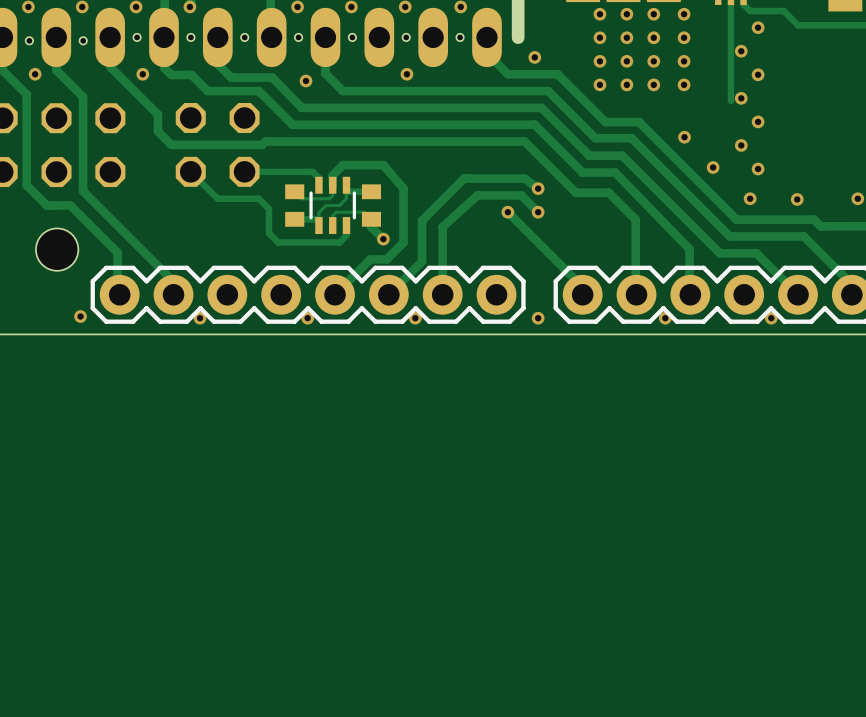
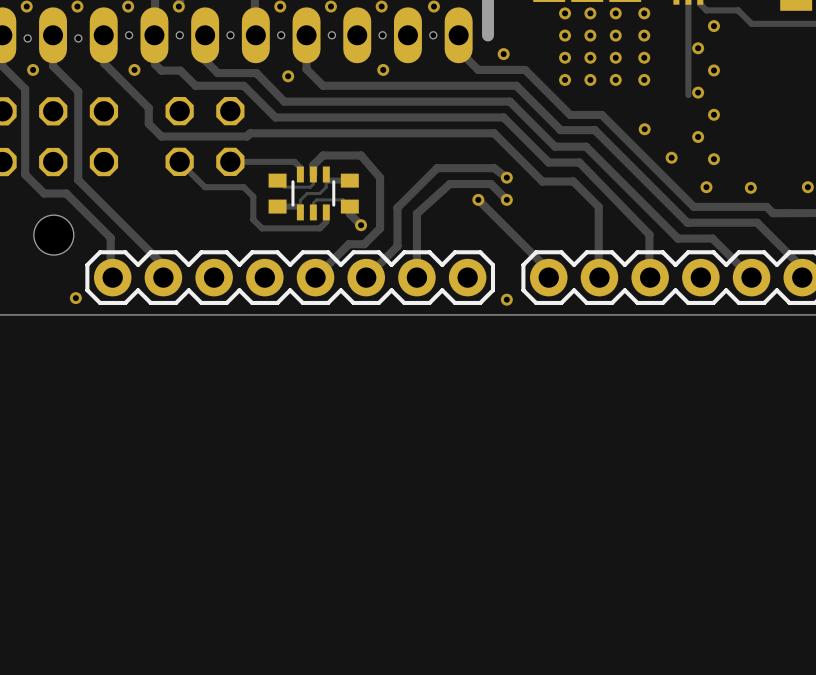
via: (200, 318) -> none
via: (307, 318) -> none
via: (415, 318) -> none
via: (665, 318) -> none
via: (771, 318) -> none

